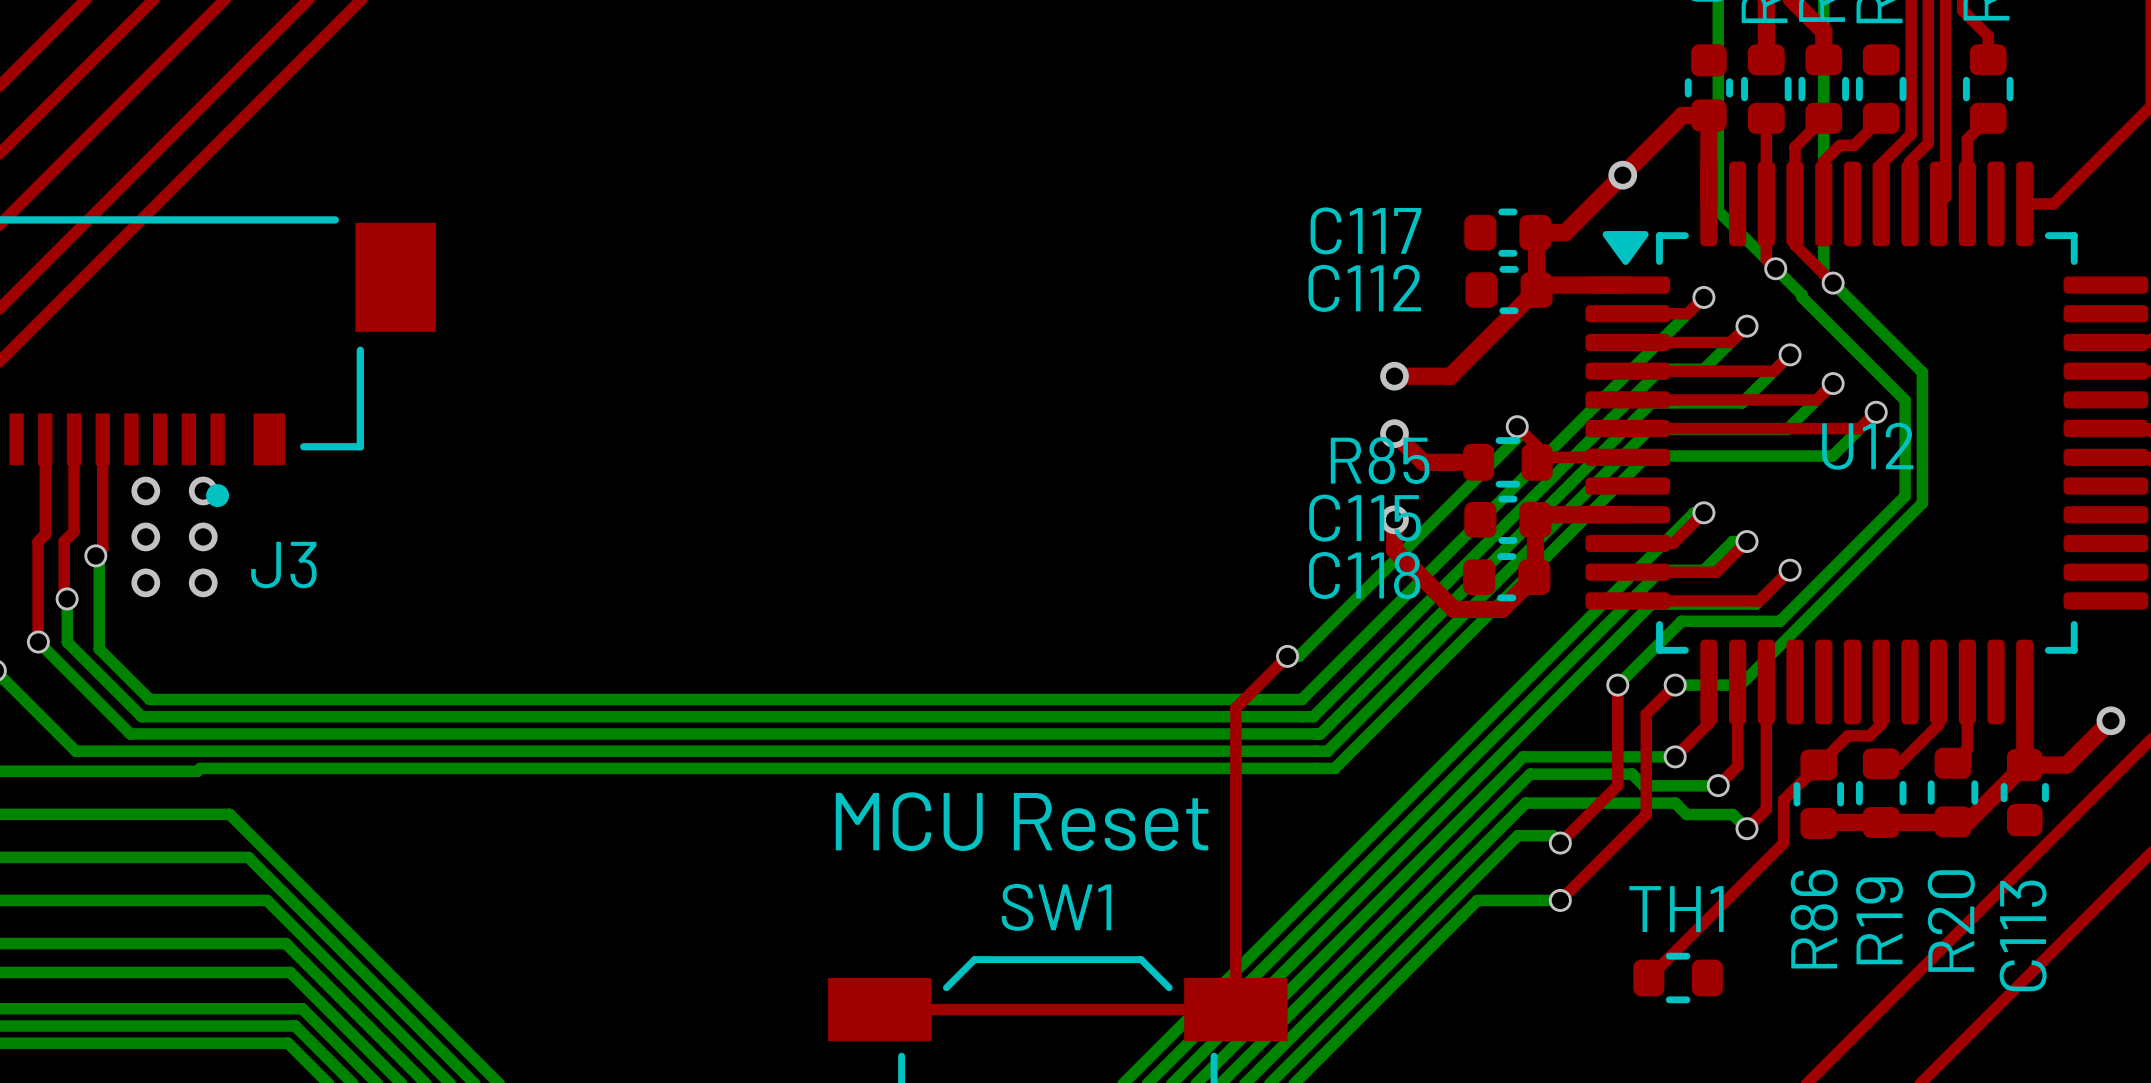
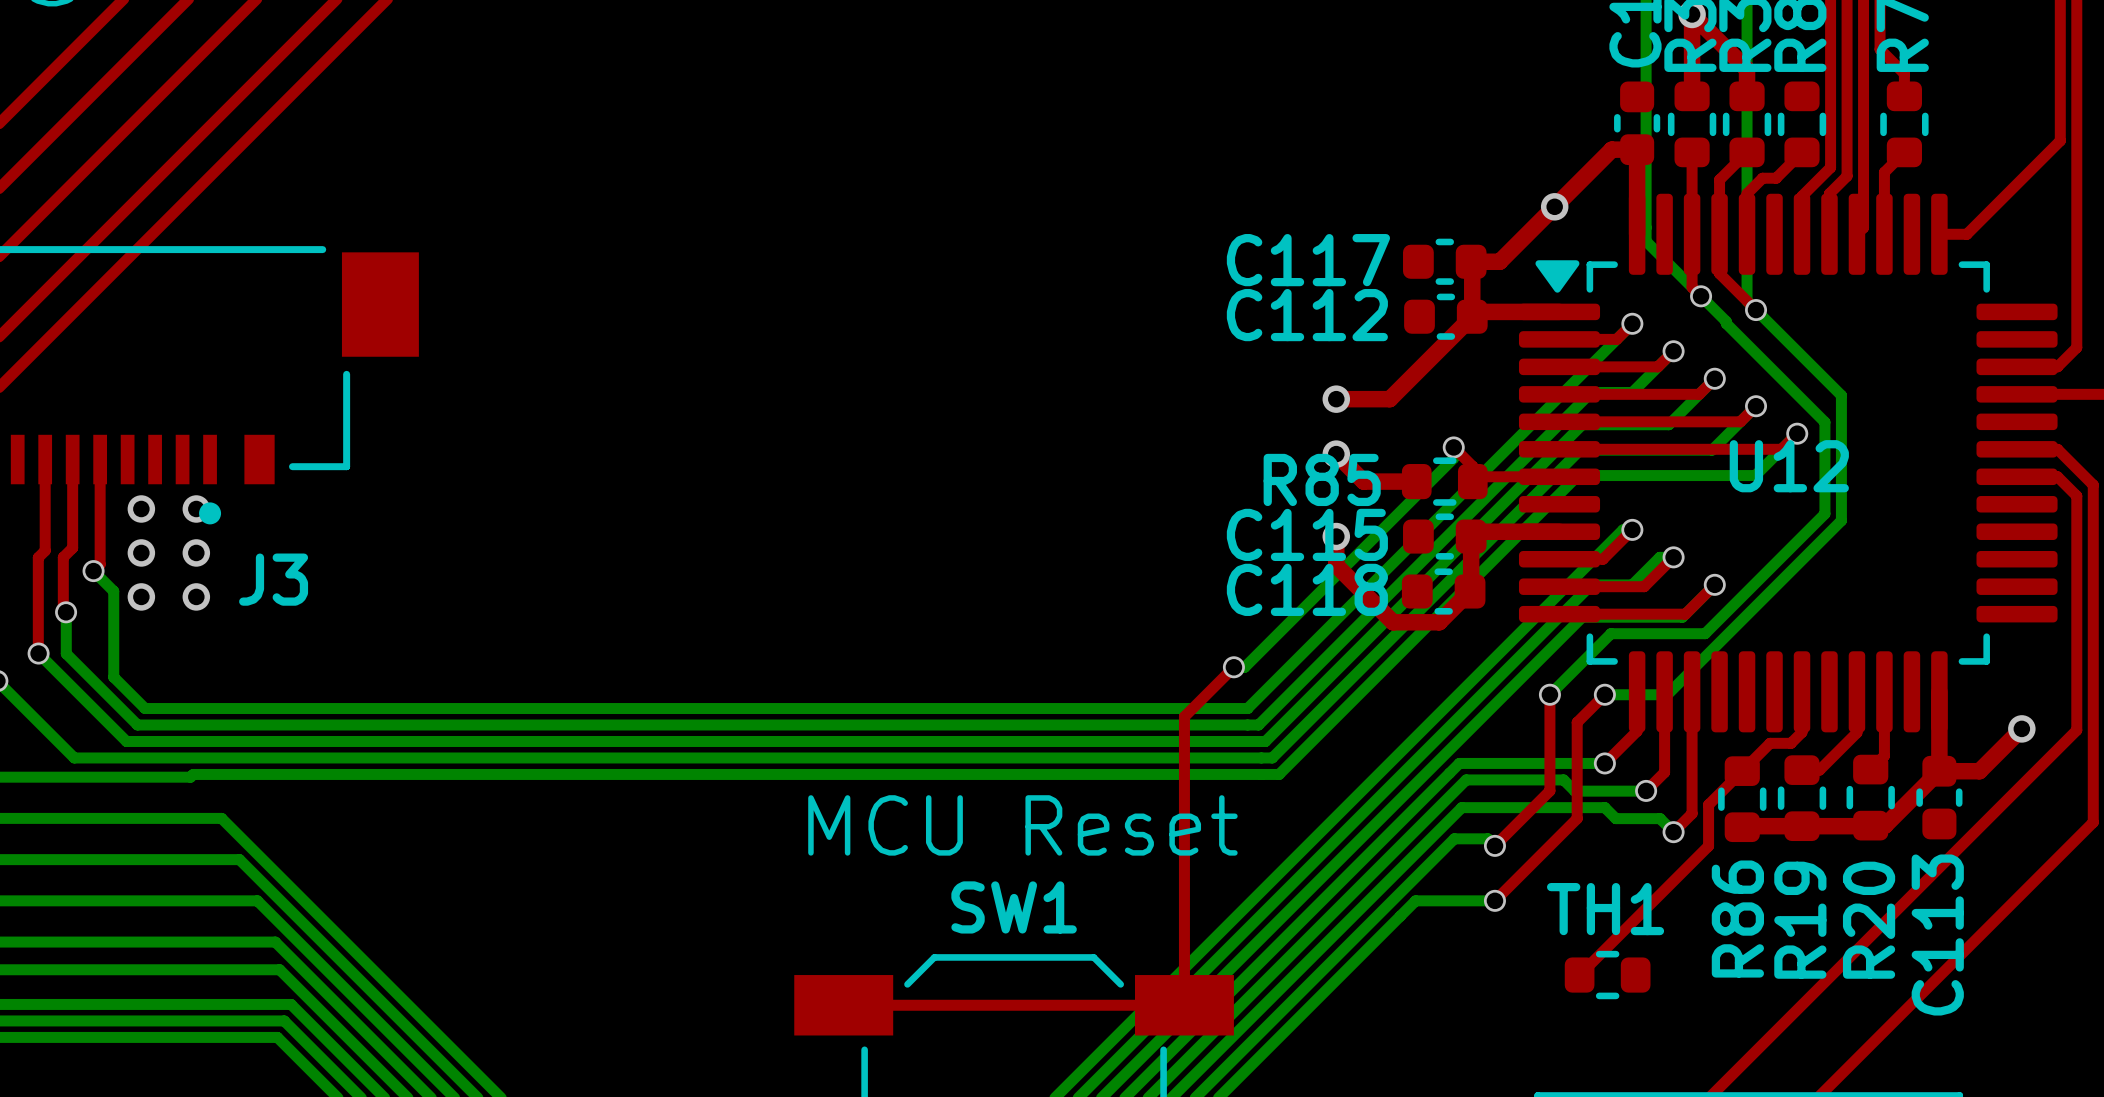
bottom track: (99, 559) (99, 649) (116, 666) -> (96, 574) (113, 591) (113, 677)

